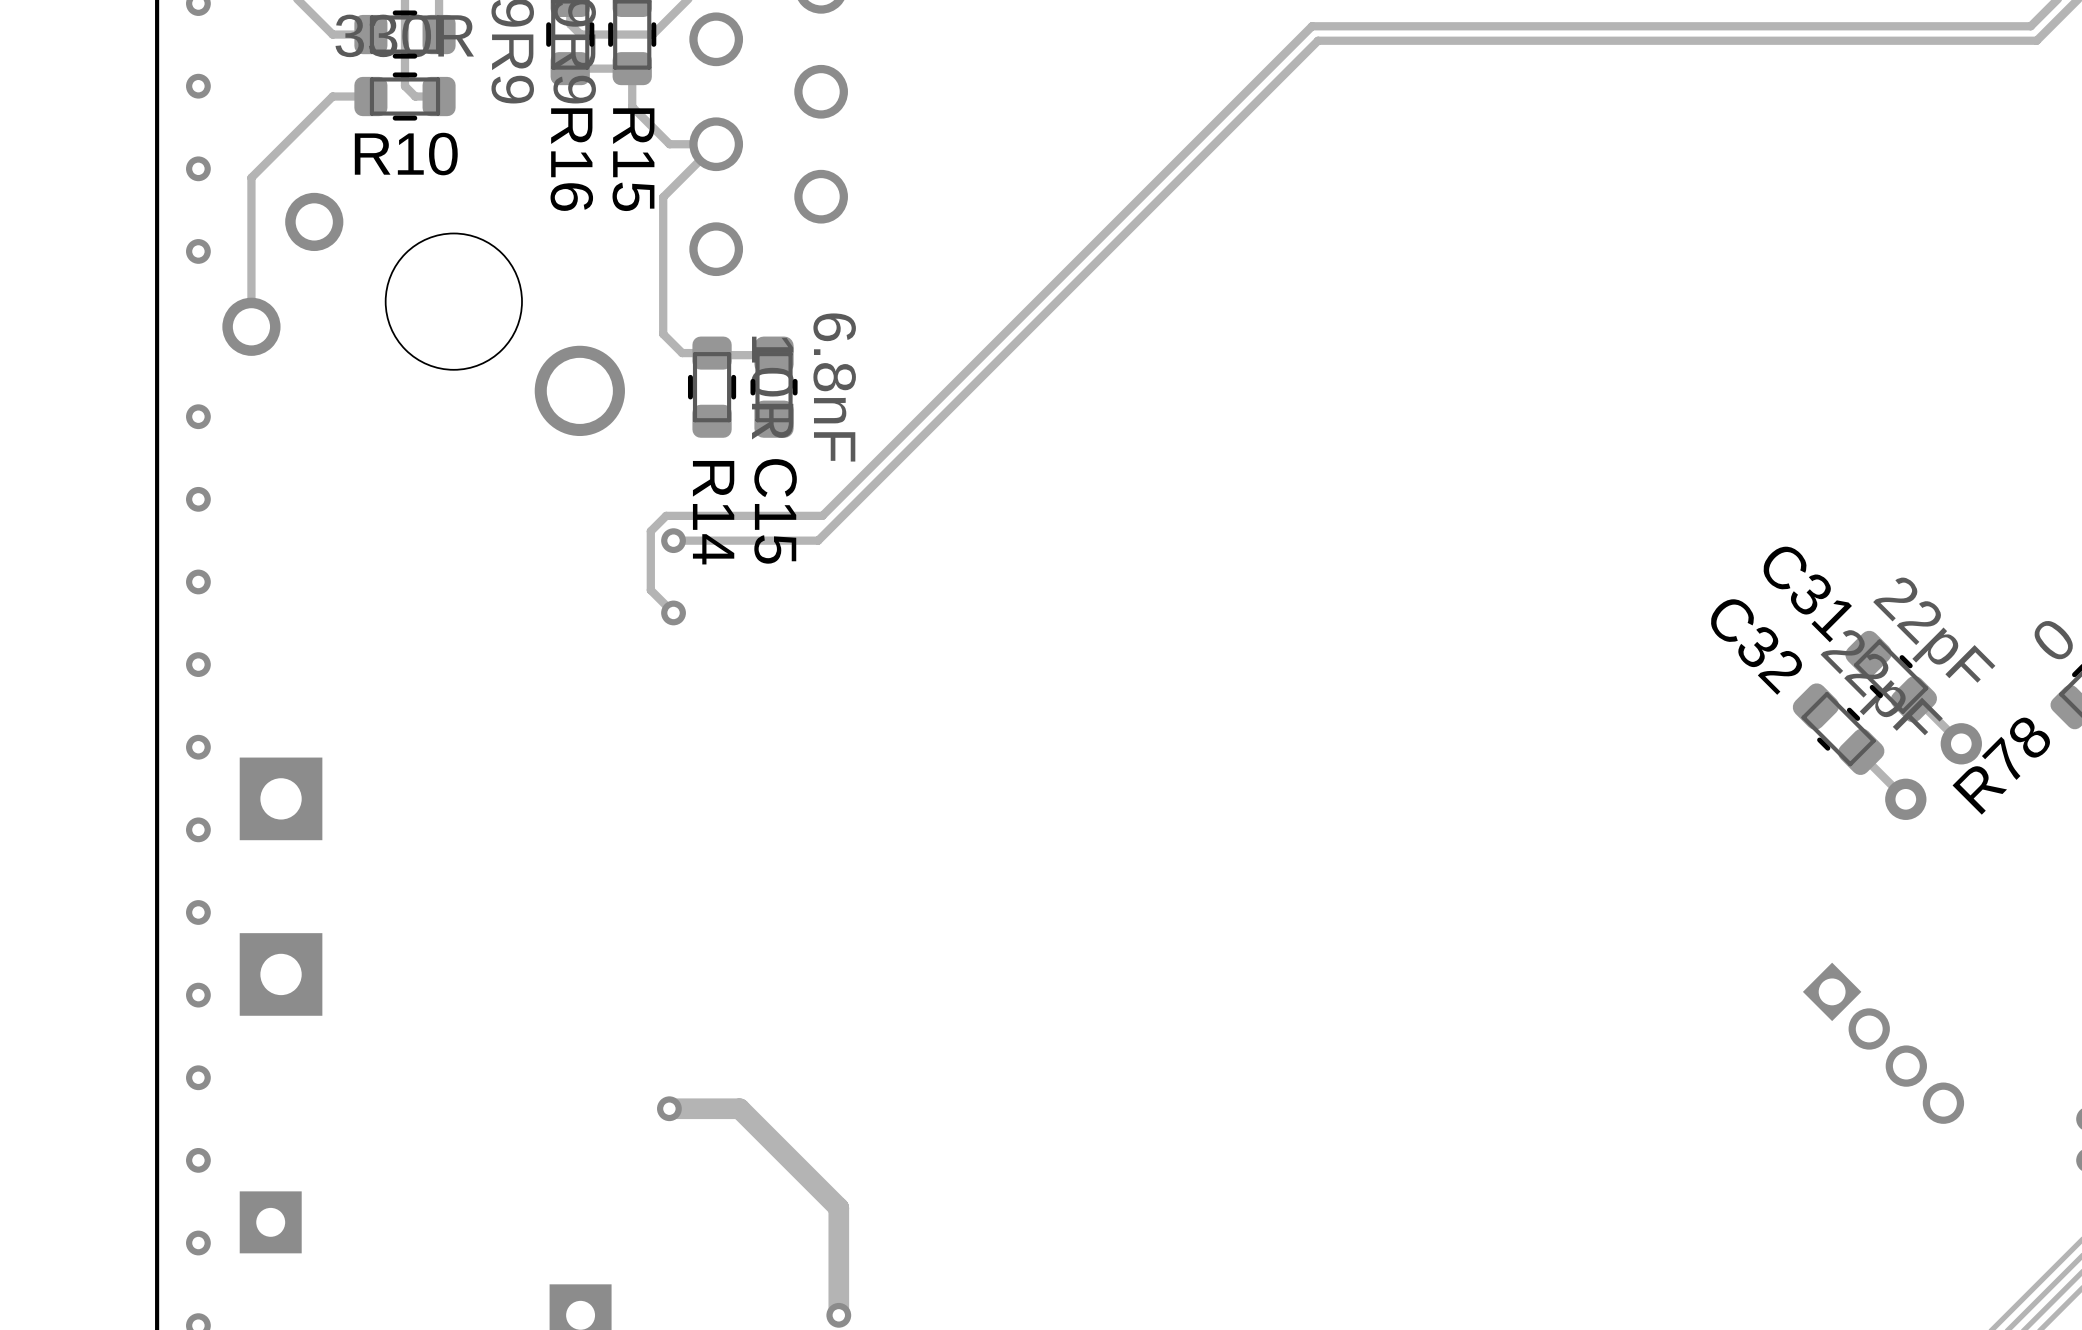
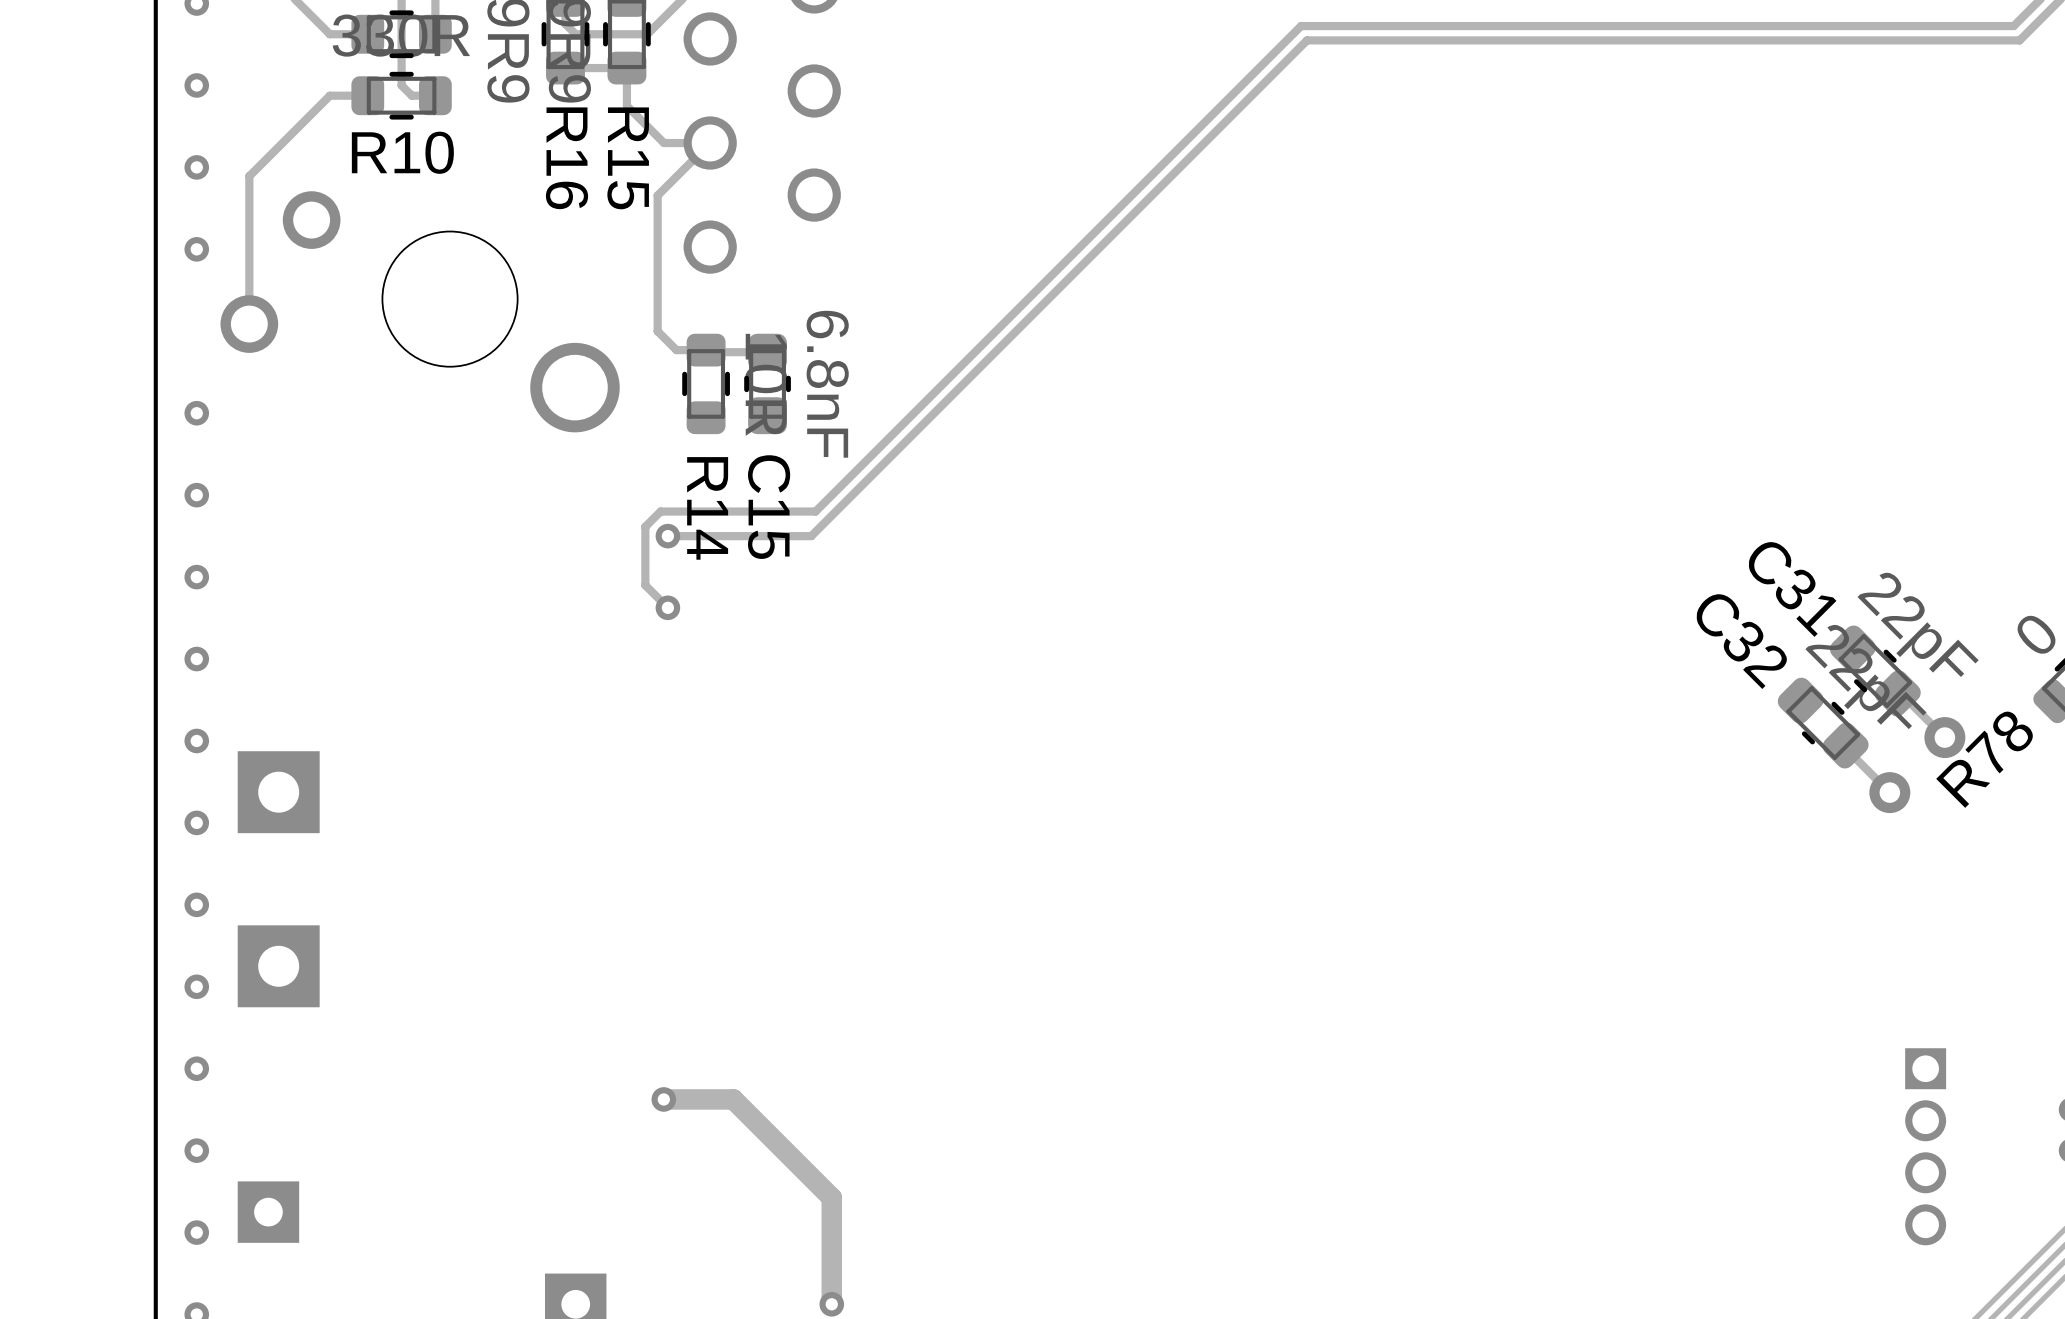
part: (1883, 1043) -> none
part: none -> (1925, 1146)

